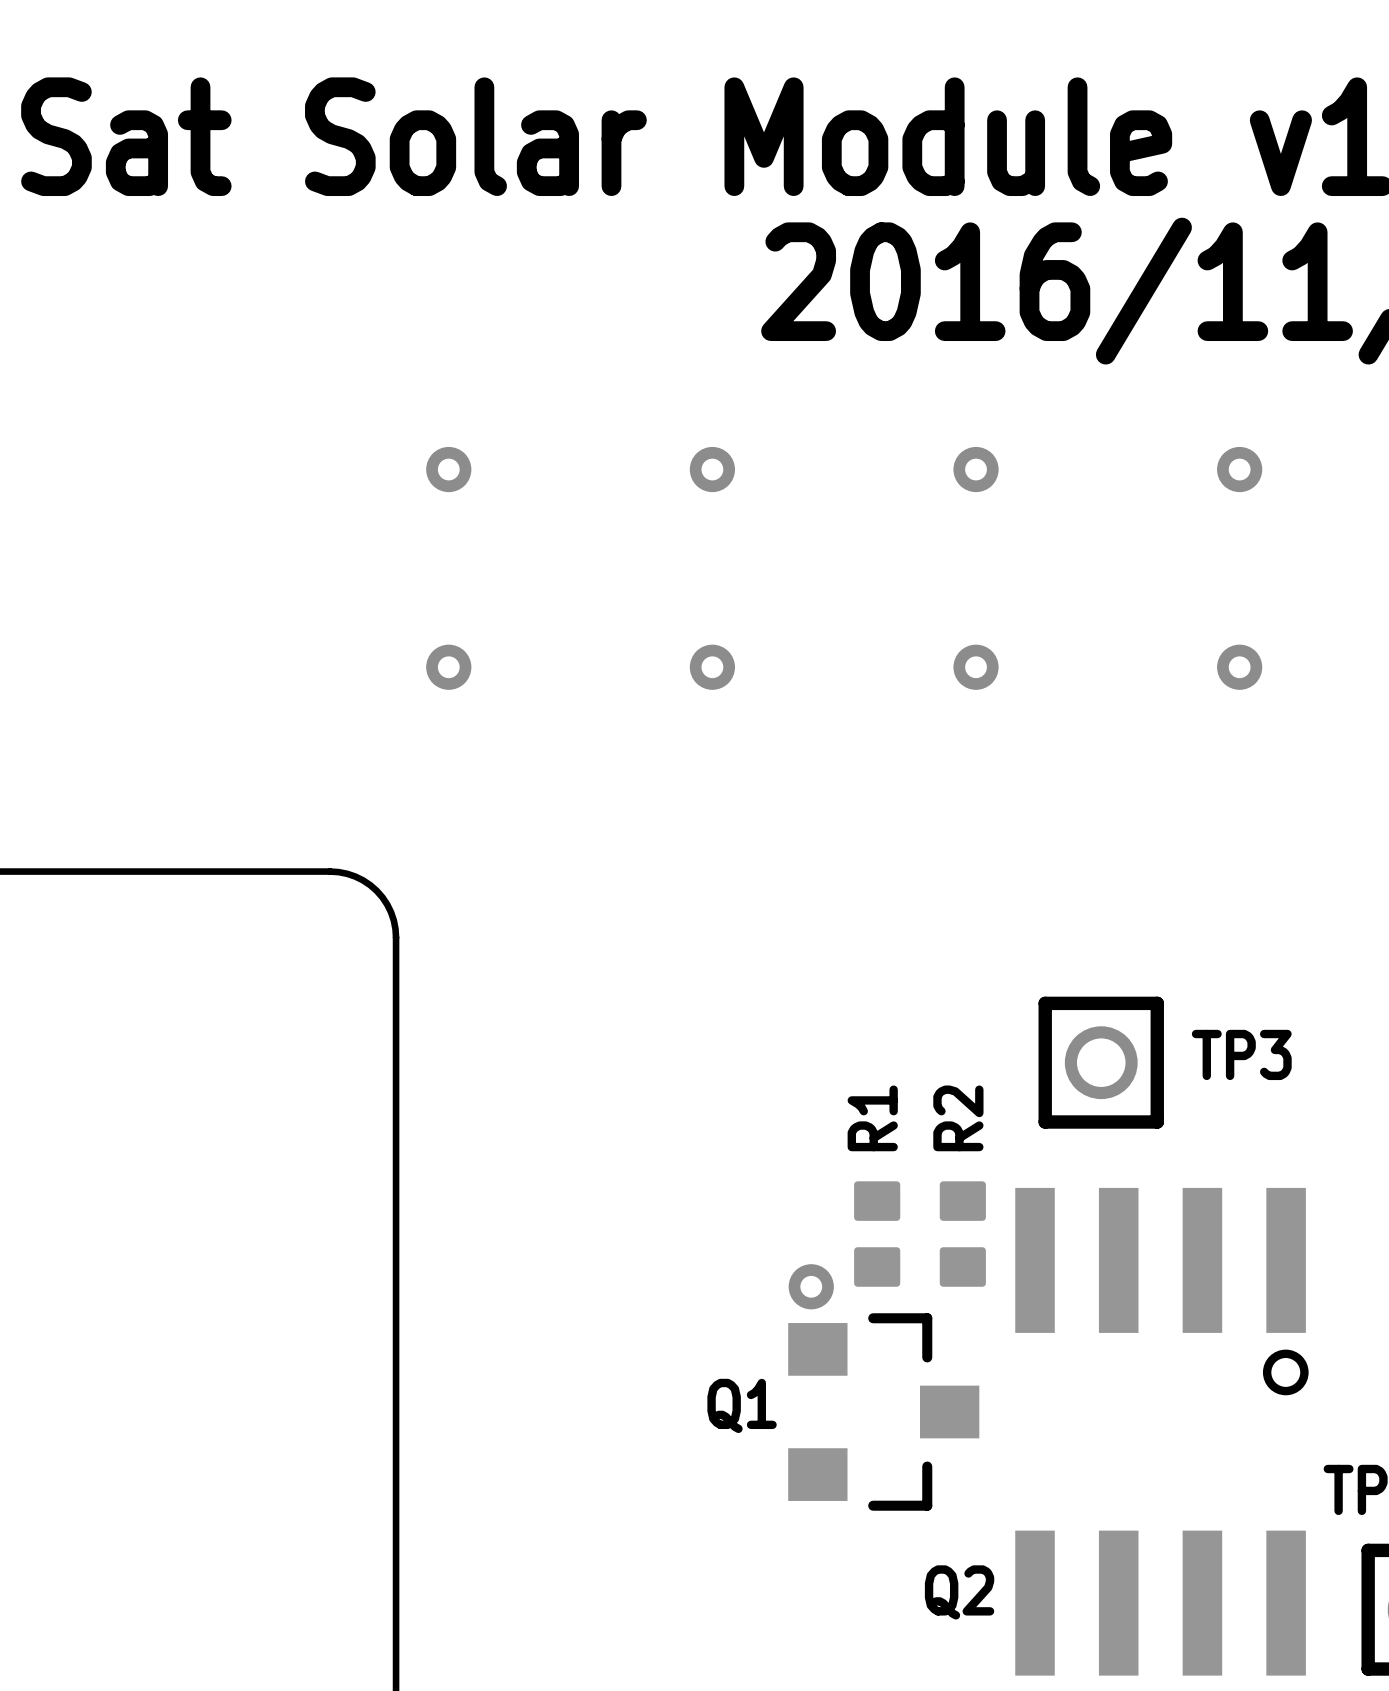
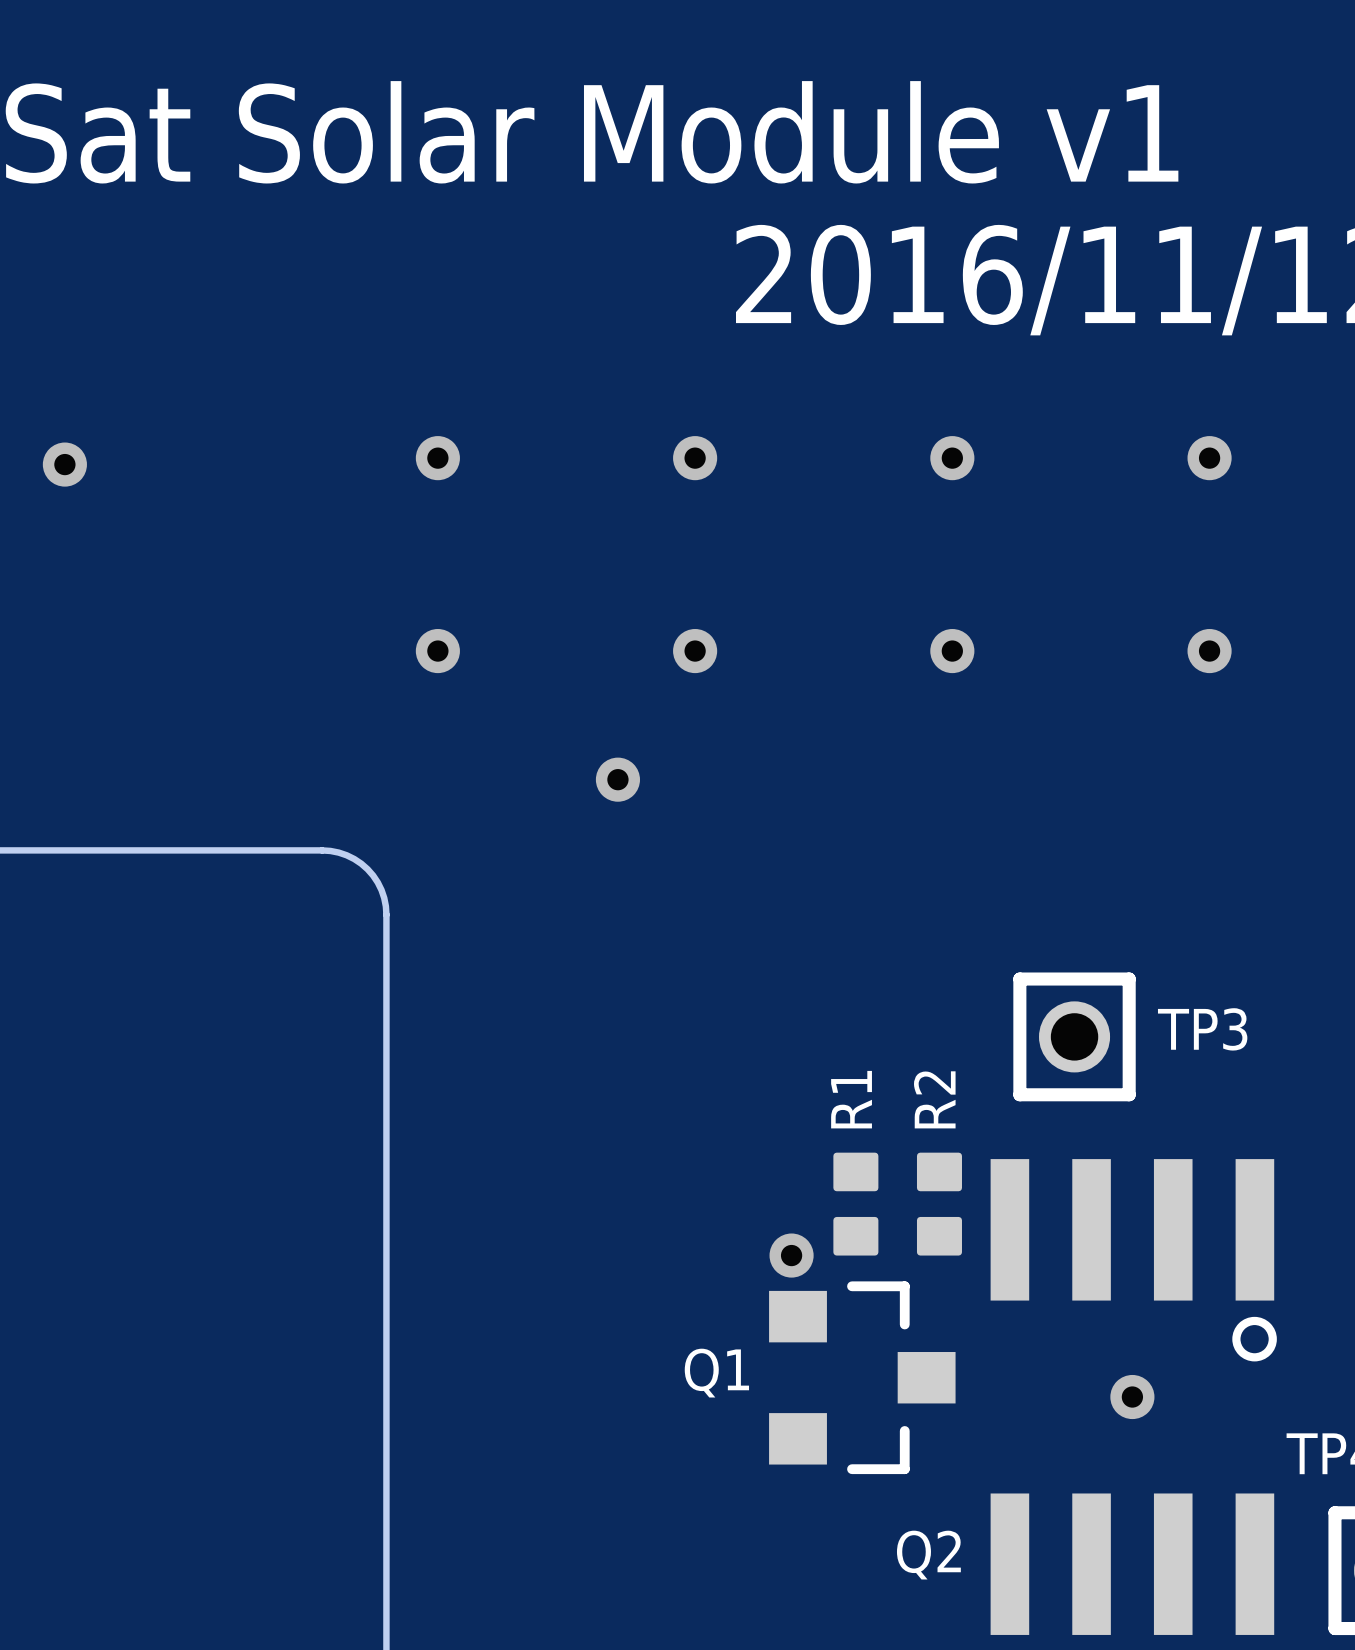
via: none -> (64, 464)
via: none -> (617, 779)
via: none -> (1132, 1397)

